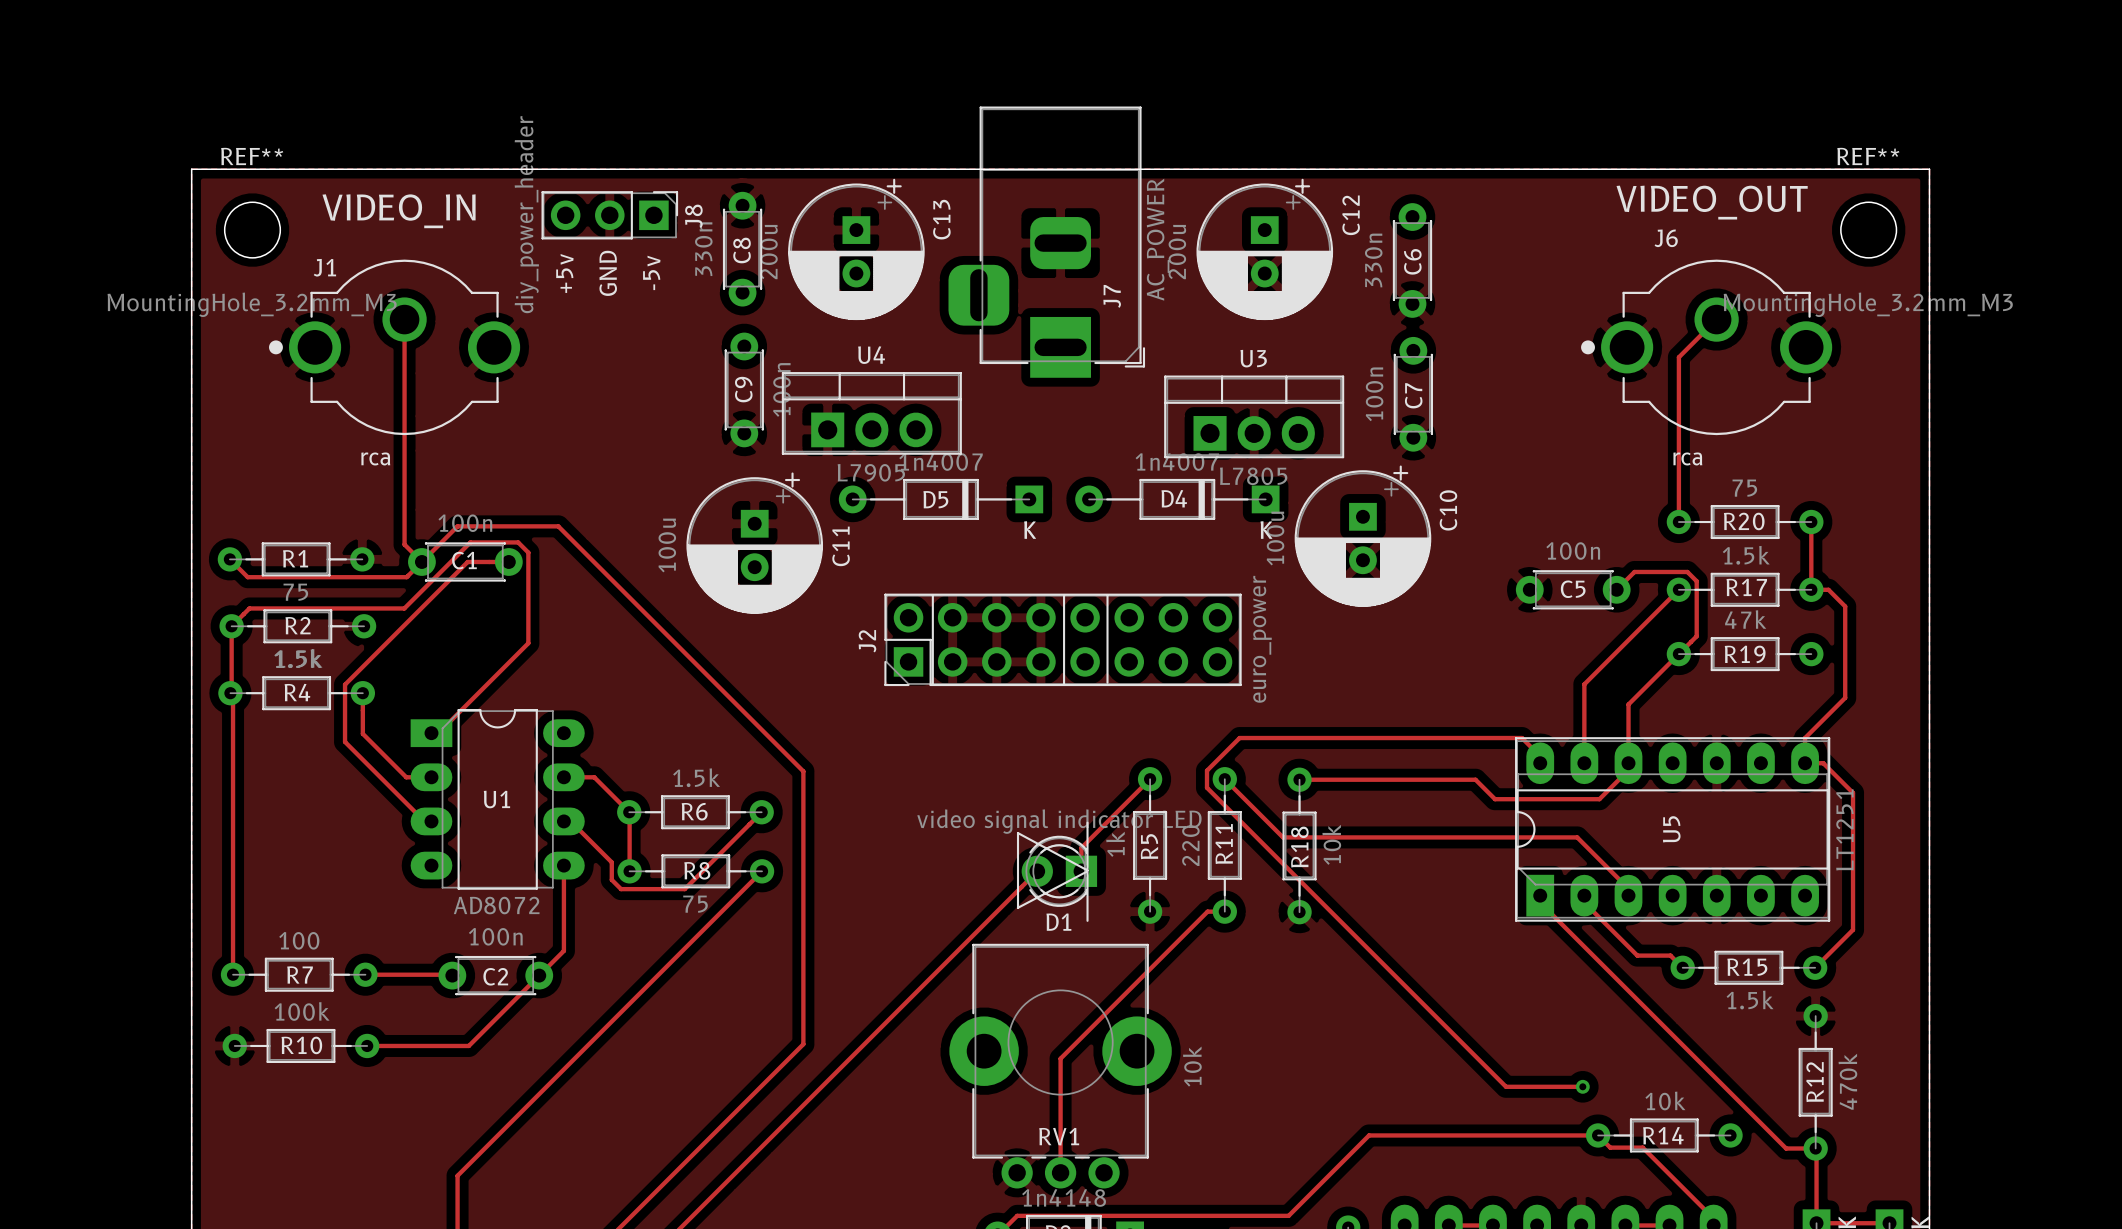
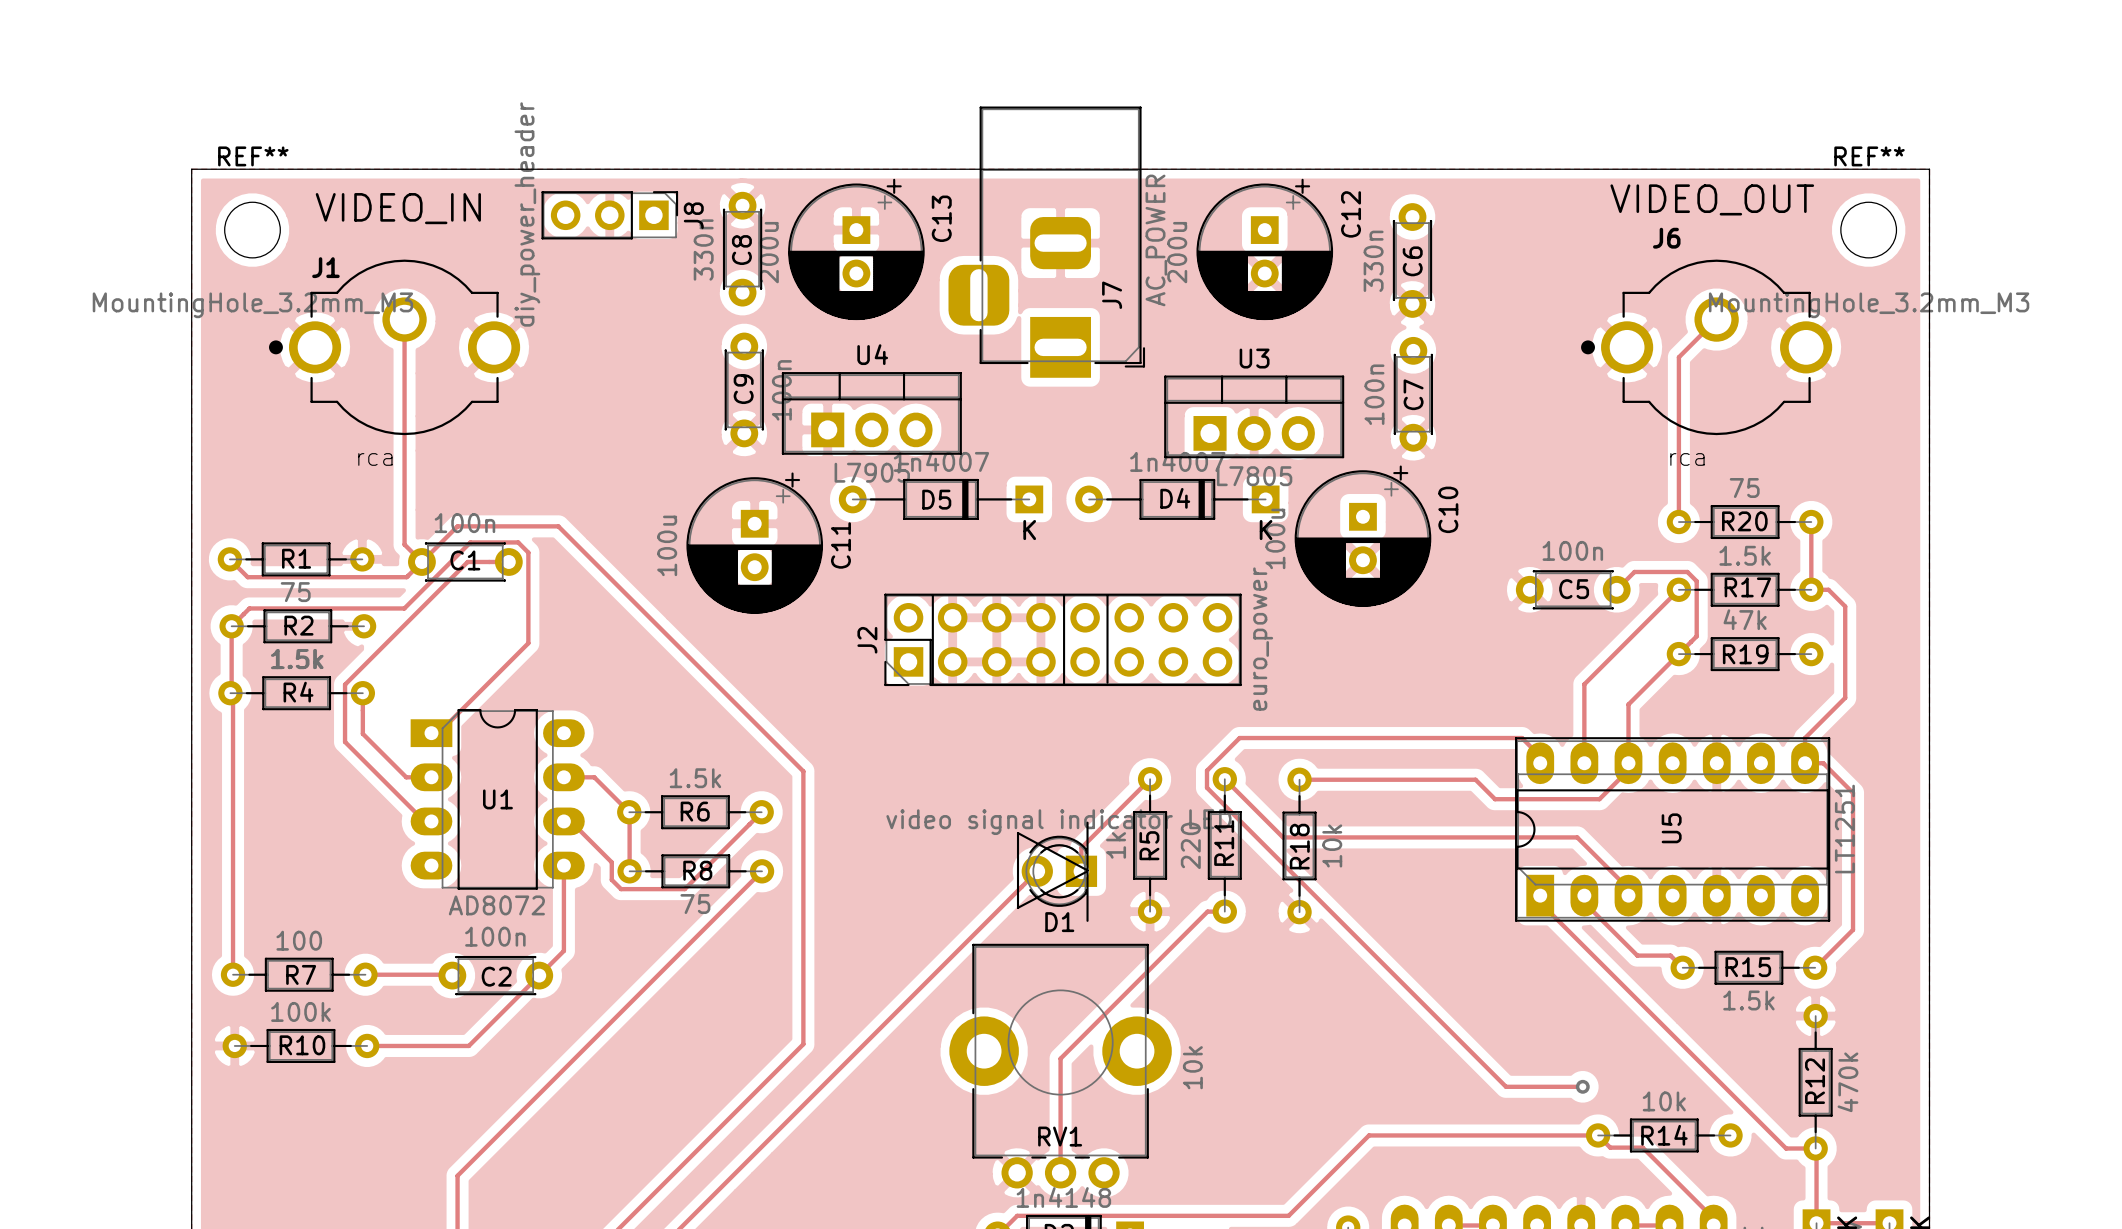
text: -5v (651, 272) -> none
text: +5v (564, 273) -> none
text: GND (608, 273) -> none

